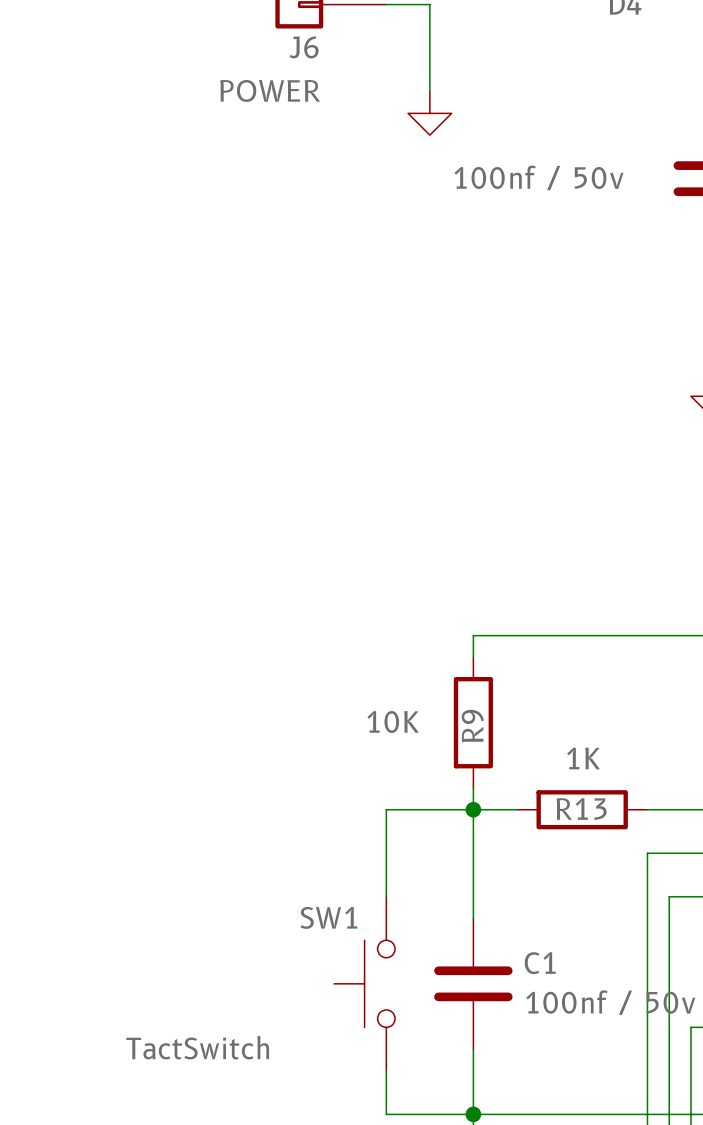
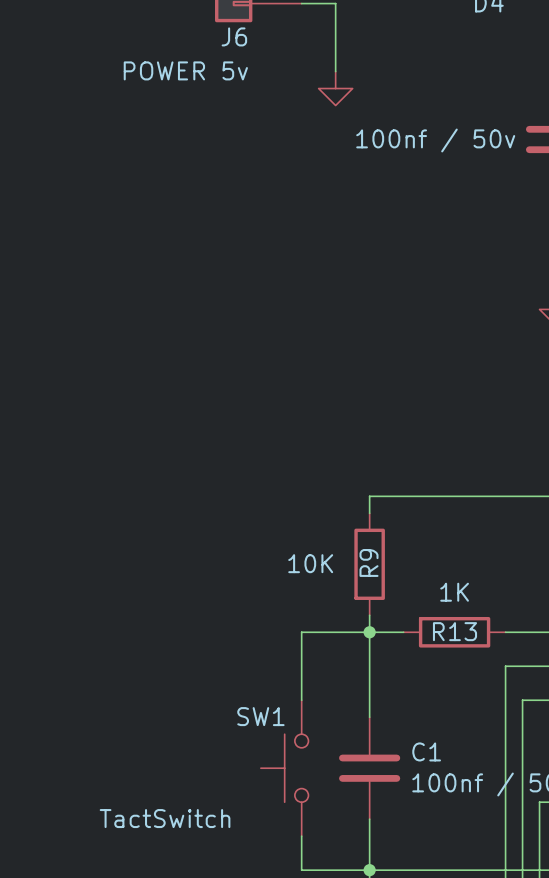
J6 value: POWER (270, 90) -> POWER 5v (185, 70)

